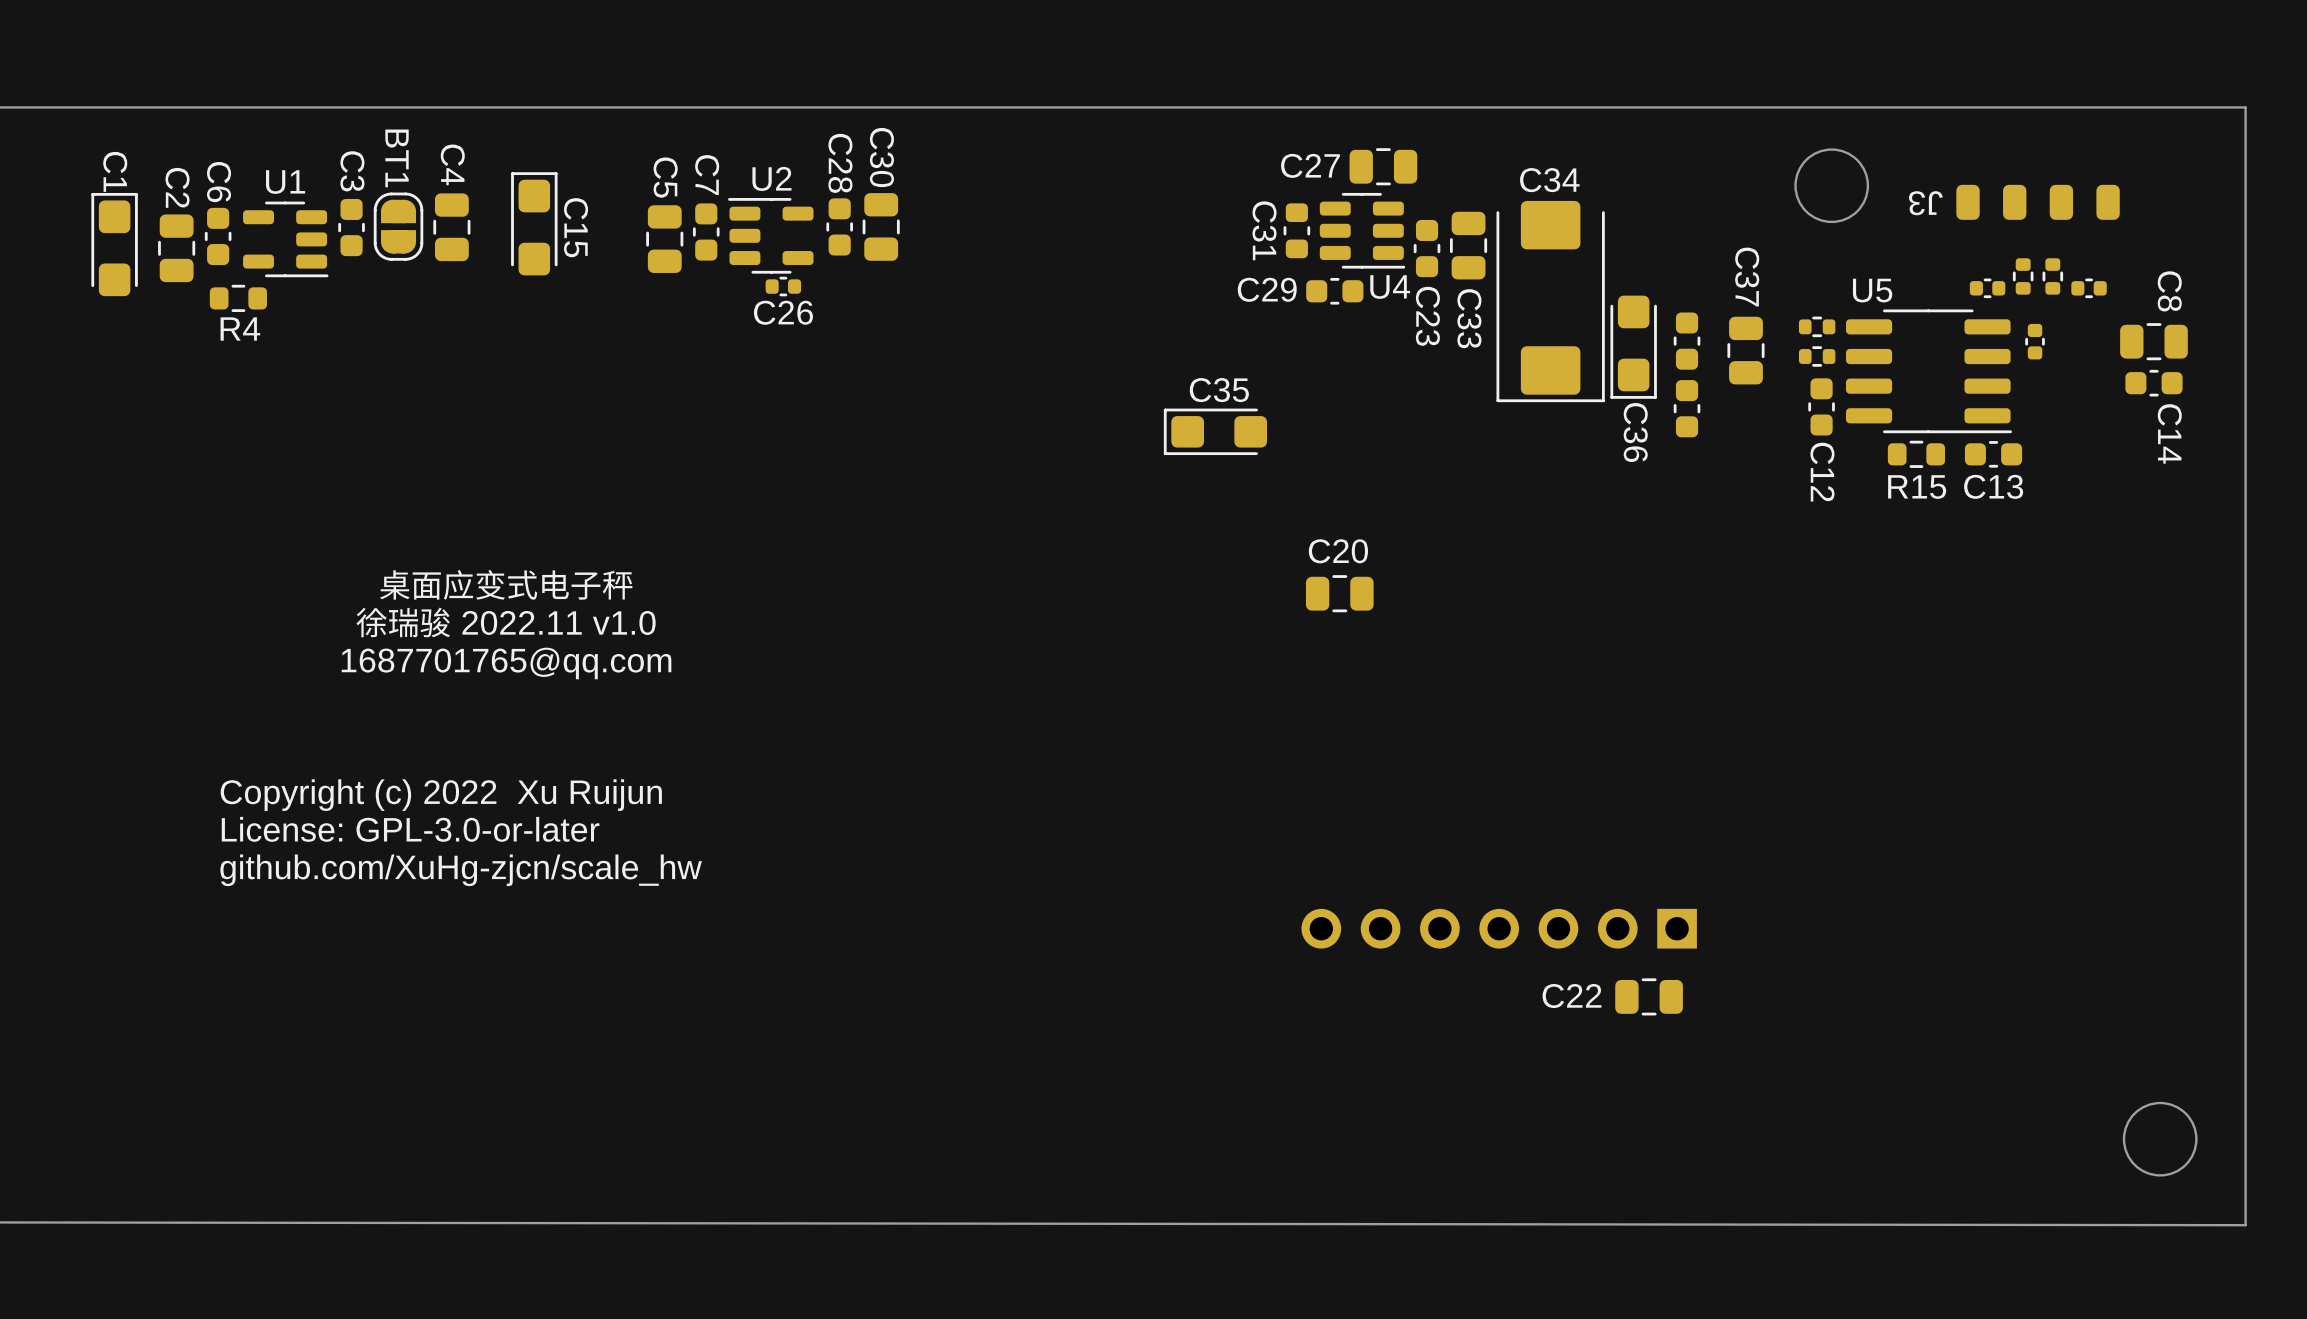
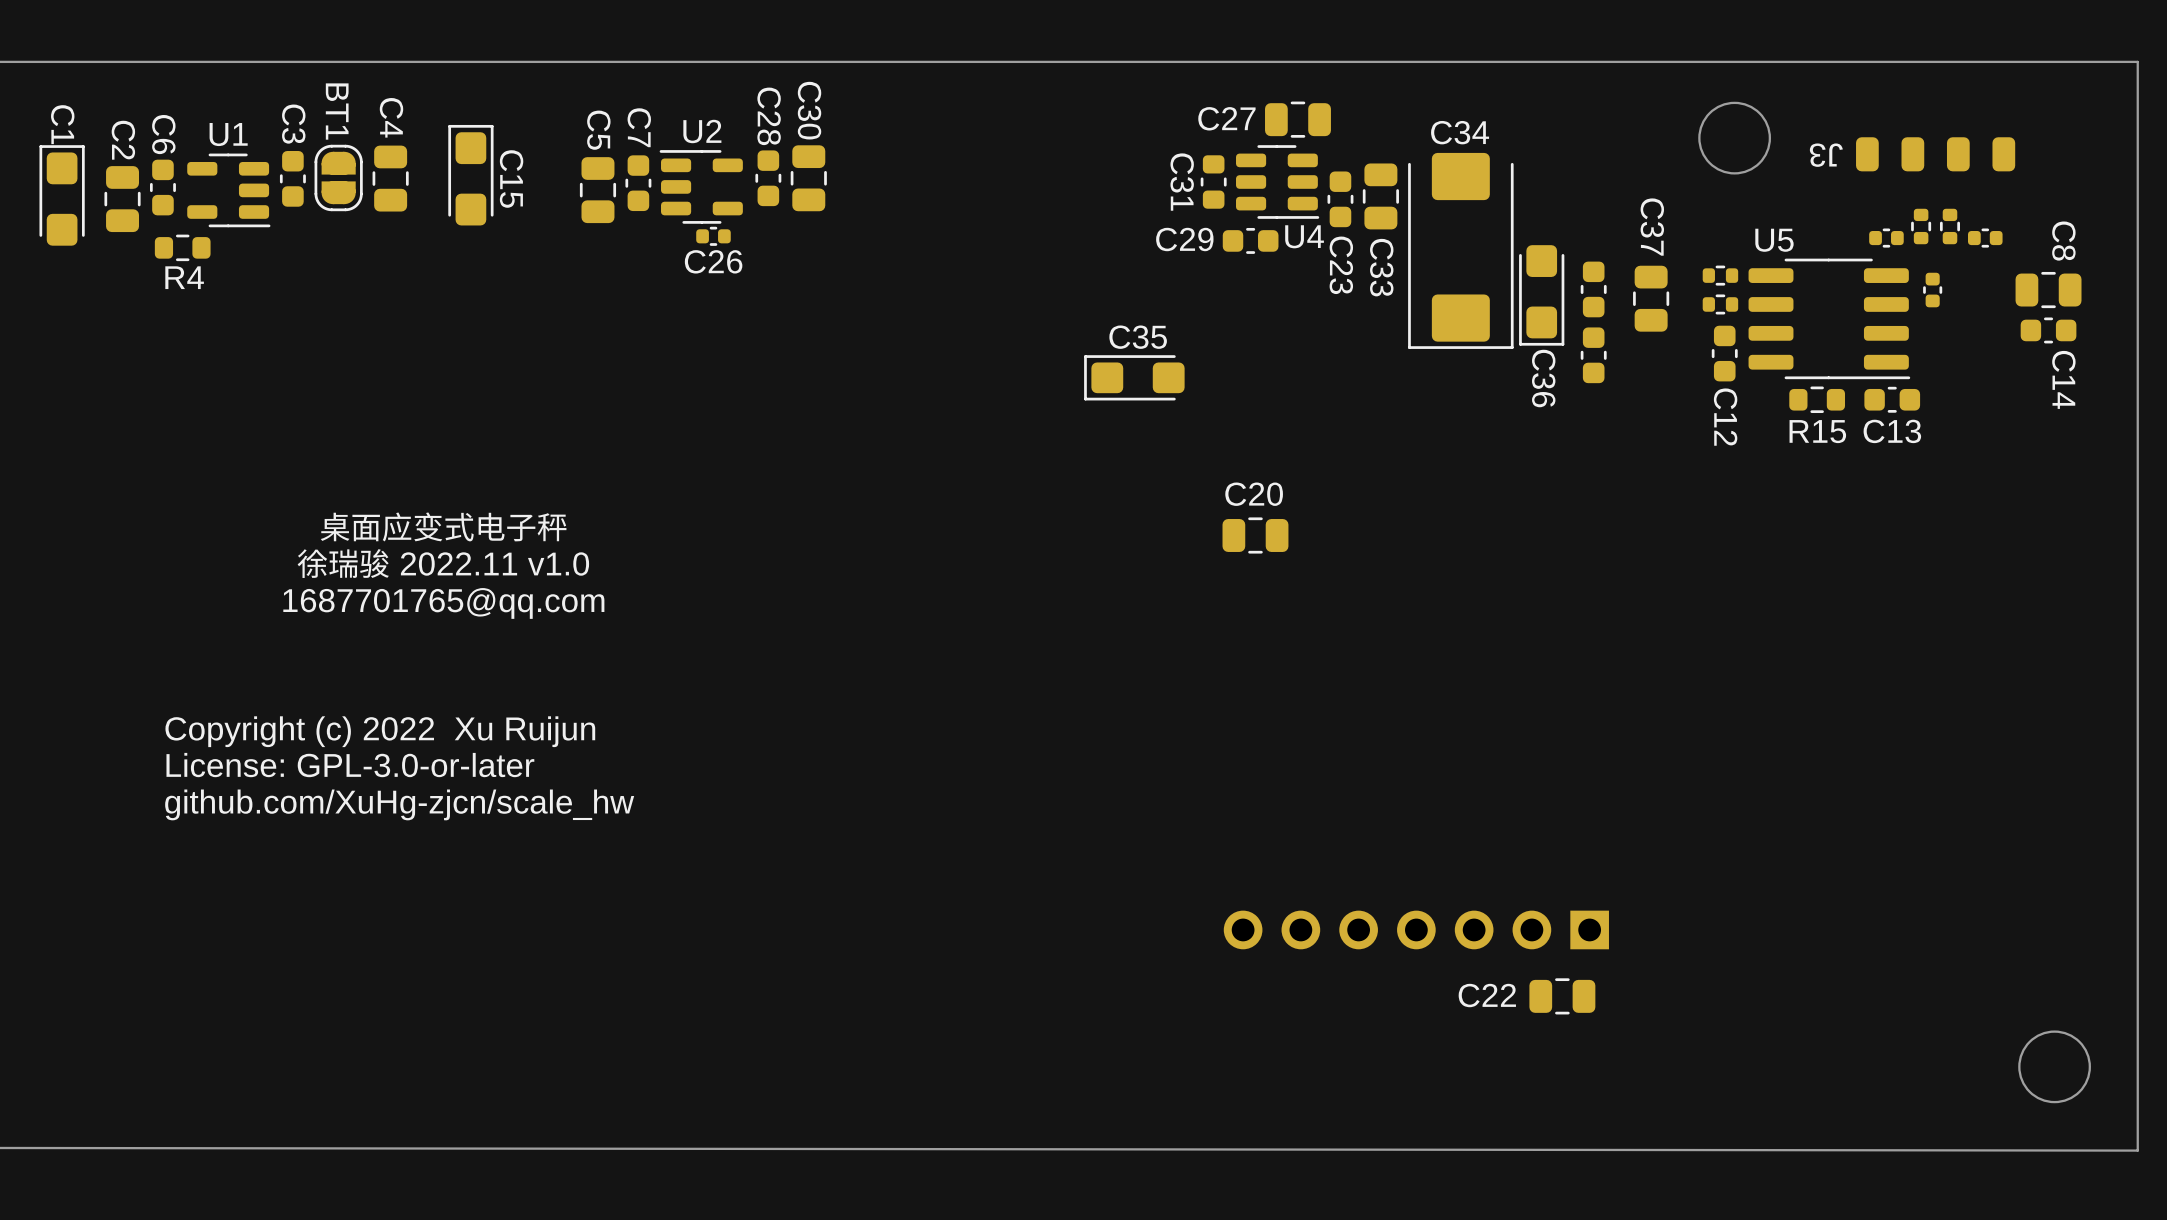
part position: (1499, 928) -> (1416, 929)
C22 position: (1649, 996) -> (1562, 996)

